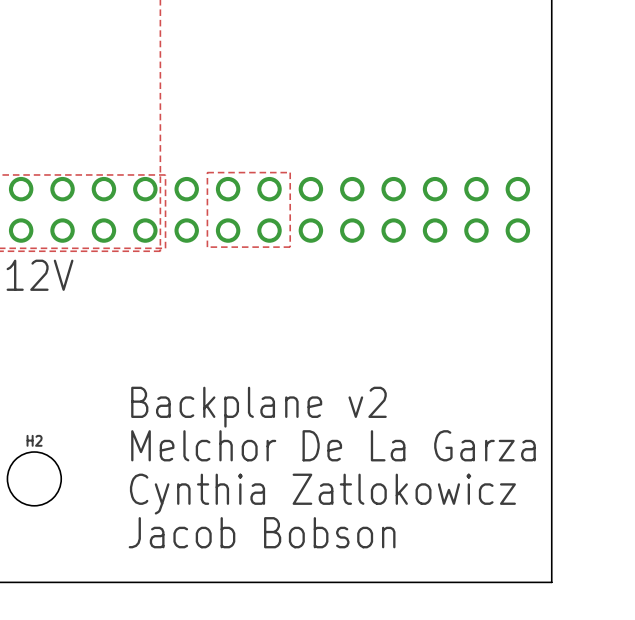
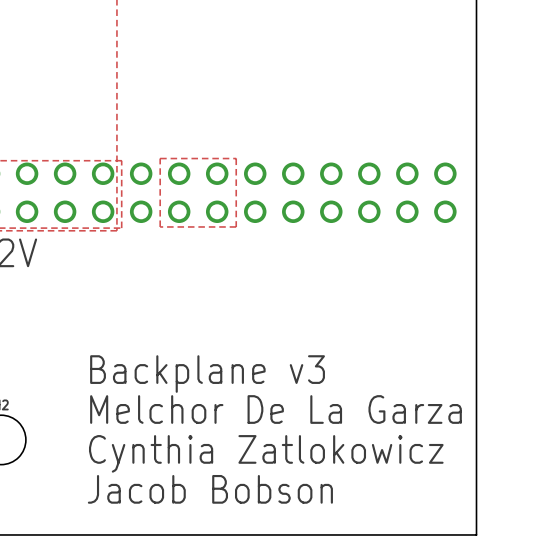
text: Backplane v2 (258, 407) -> Backplane v3 (207, 374)

